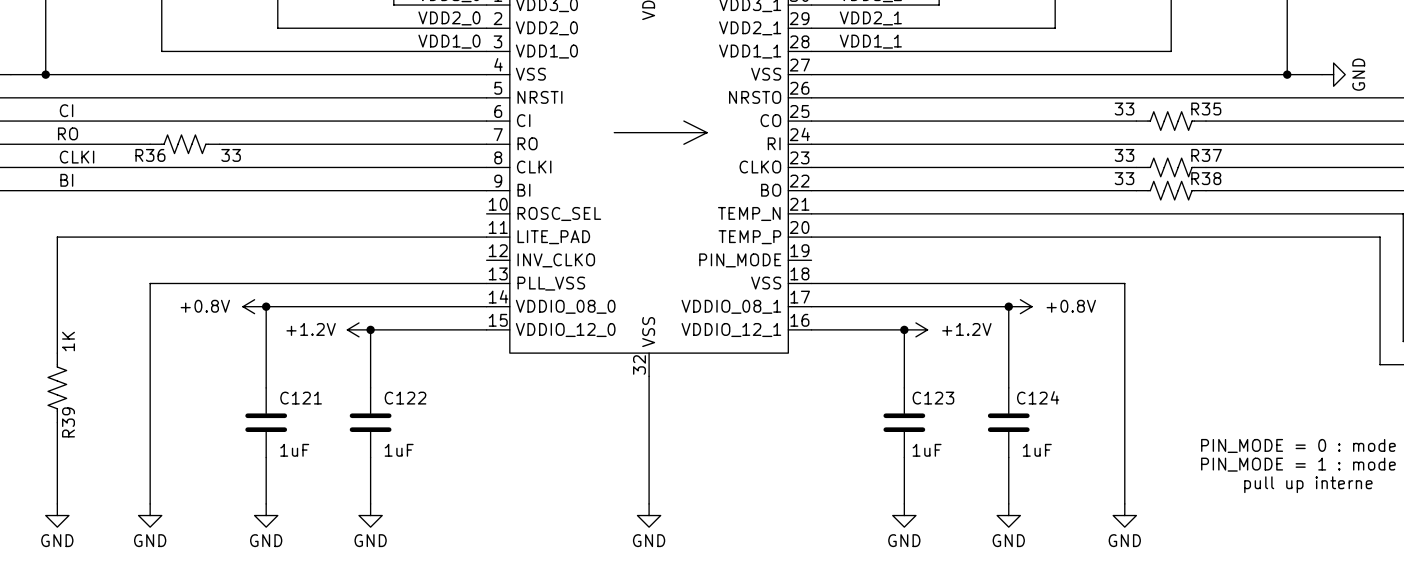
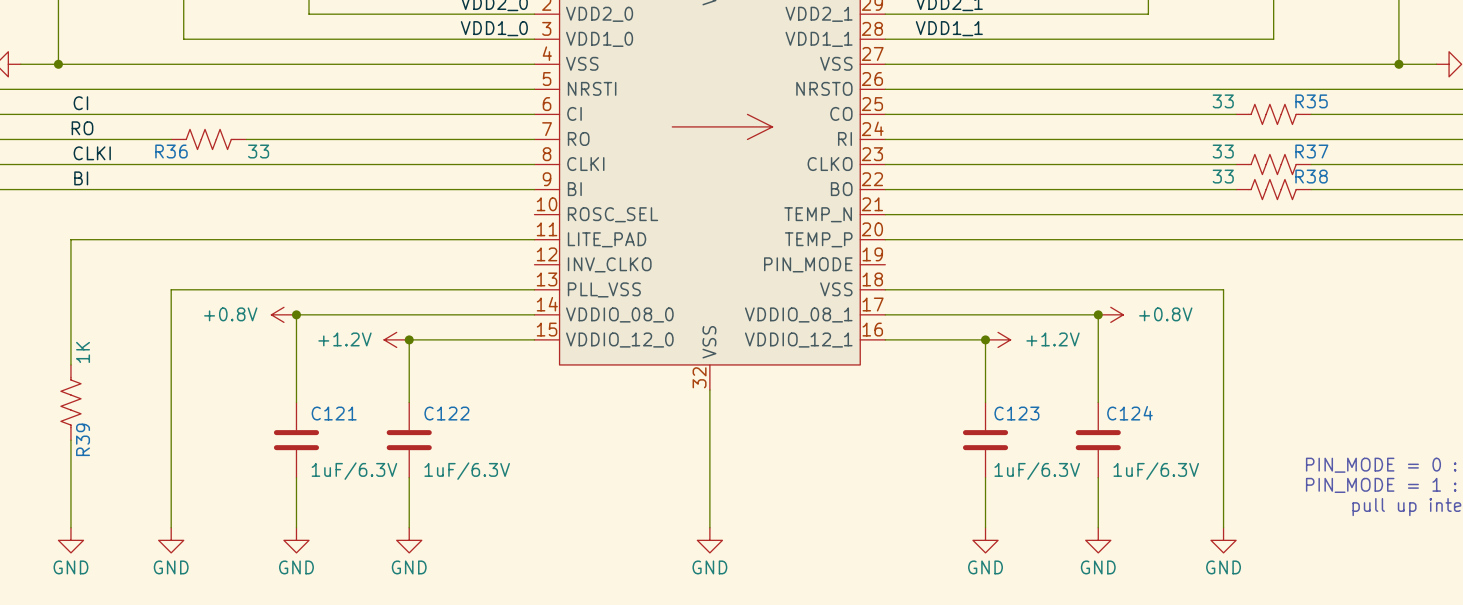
C121 value: 1uF (294, 450) -> 1uF/6.3V (354, 471)
C122 value: 1uF (399, 450) -> 1uF/6.3V (467, 471)
C123 value: 1uF (927, 450) -> 1uF/6.3V (1037, 471)
C124 value: 1uF (1037, 450) -> 1uF/6.3V (1156, 471)

